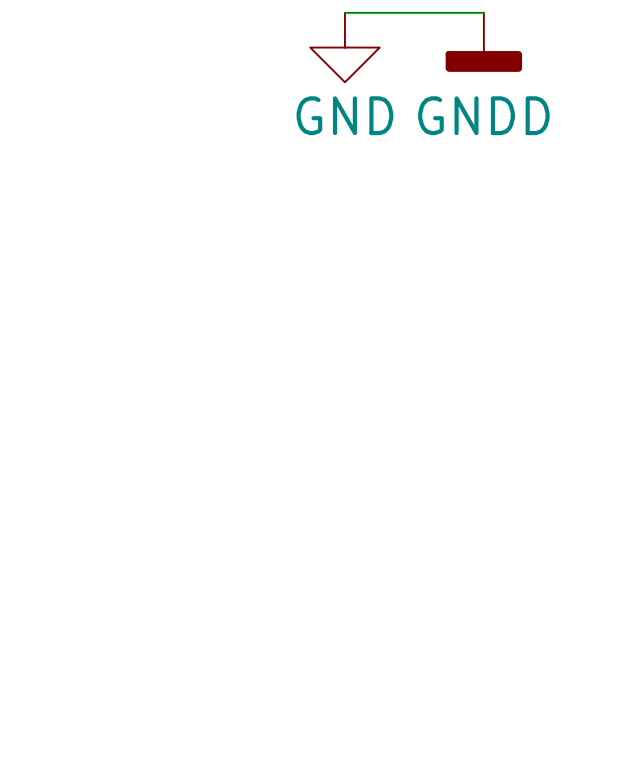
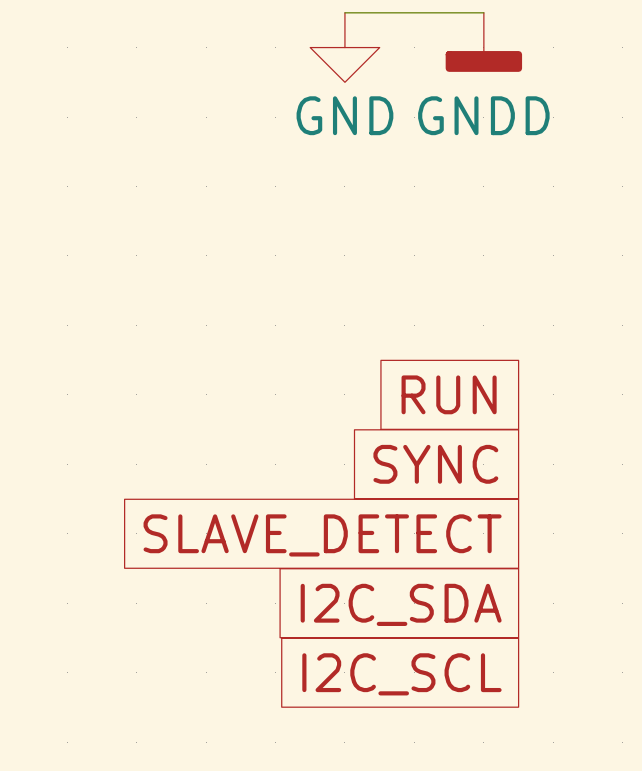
global label: none -> RUN (449, 394)
global label: none -> SYNC (435, 464)
global label: none -> SLAVE_DETECT (322, 535)
global label: none -> I2C_SDA (401, 604)
global label: none -> I2C_SCL (401, 674)

